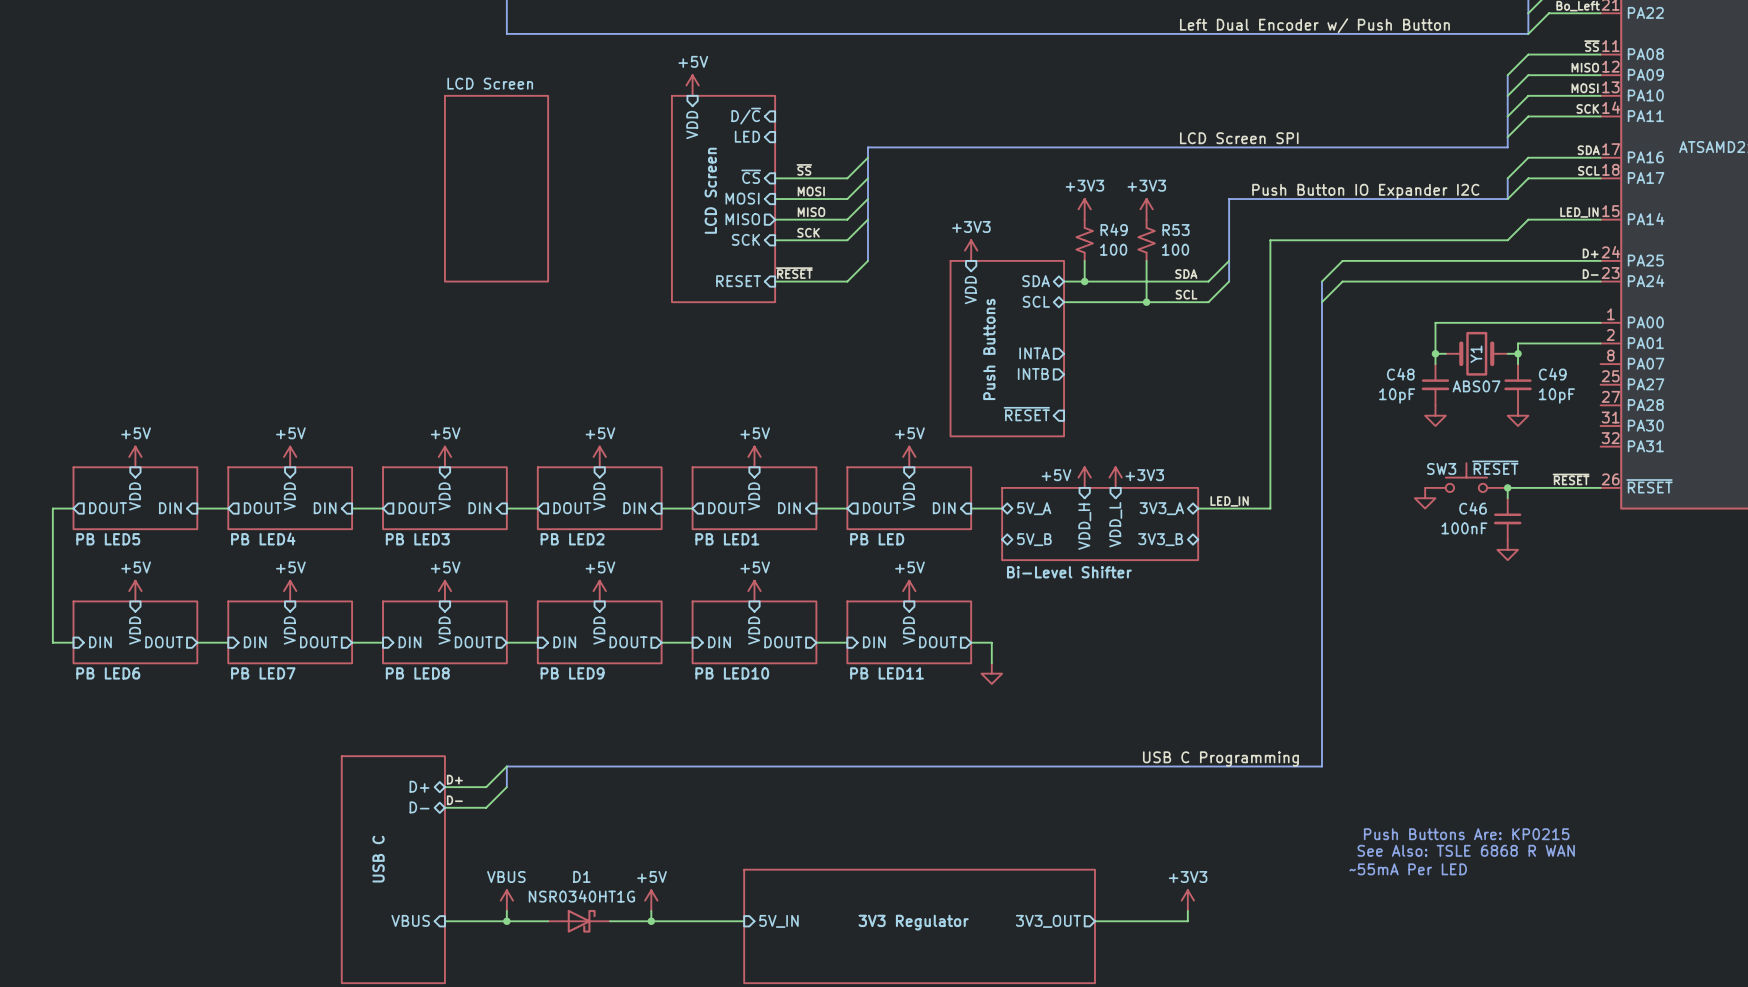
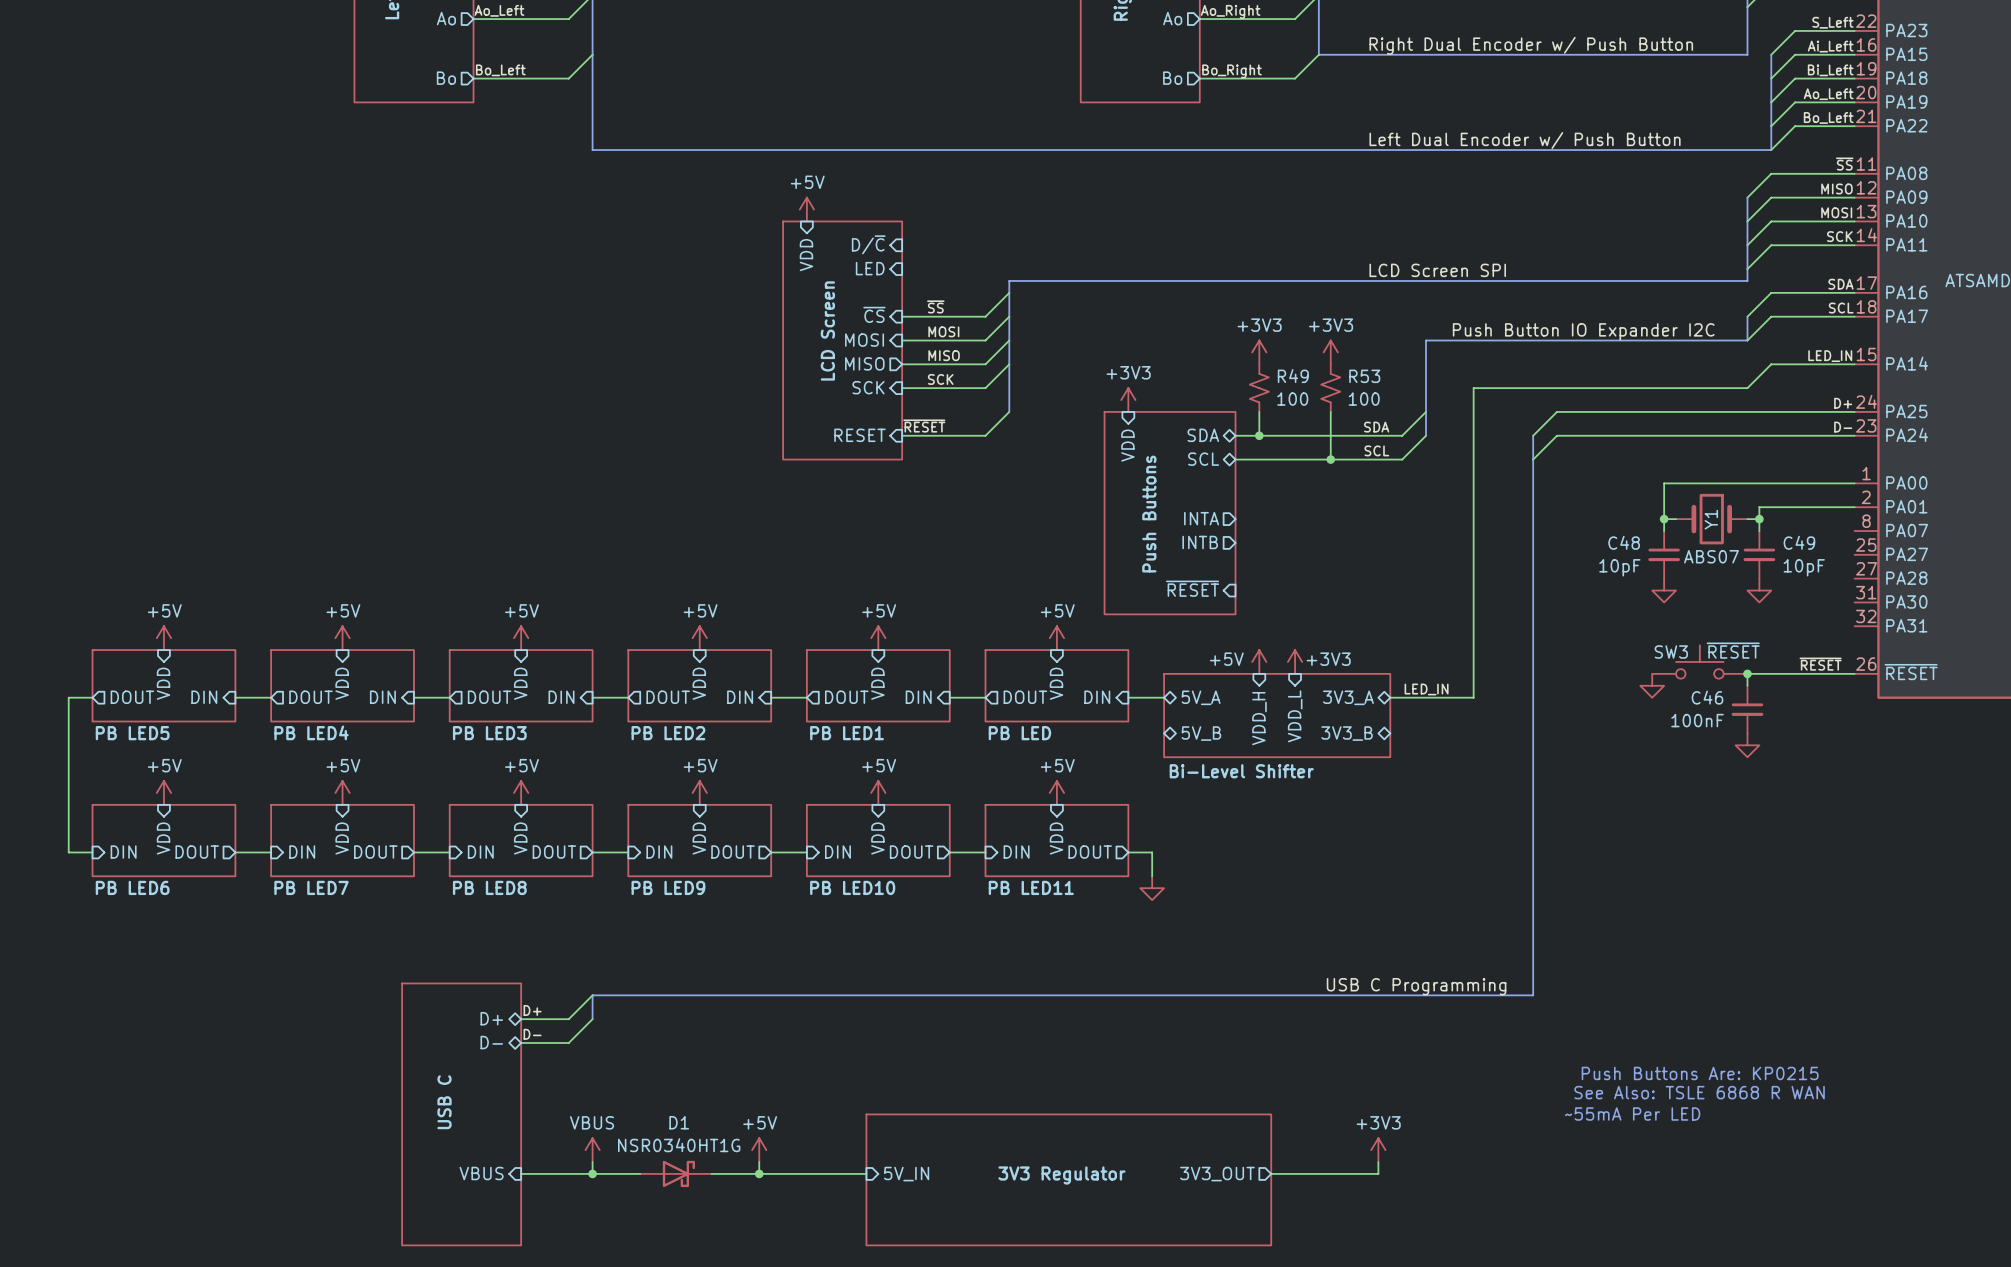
sheet LCD Screen: (496, 188) -> none

